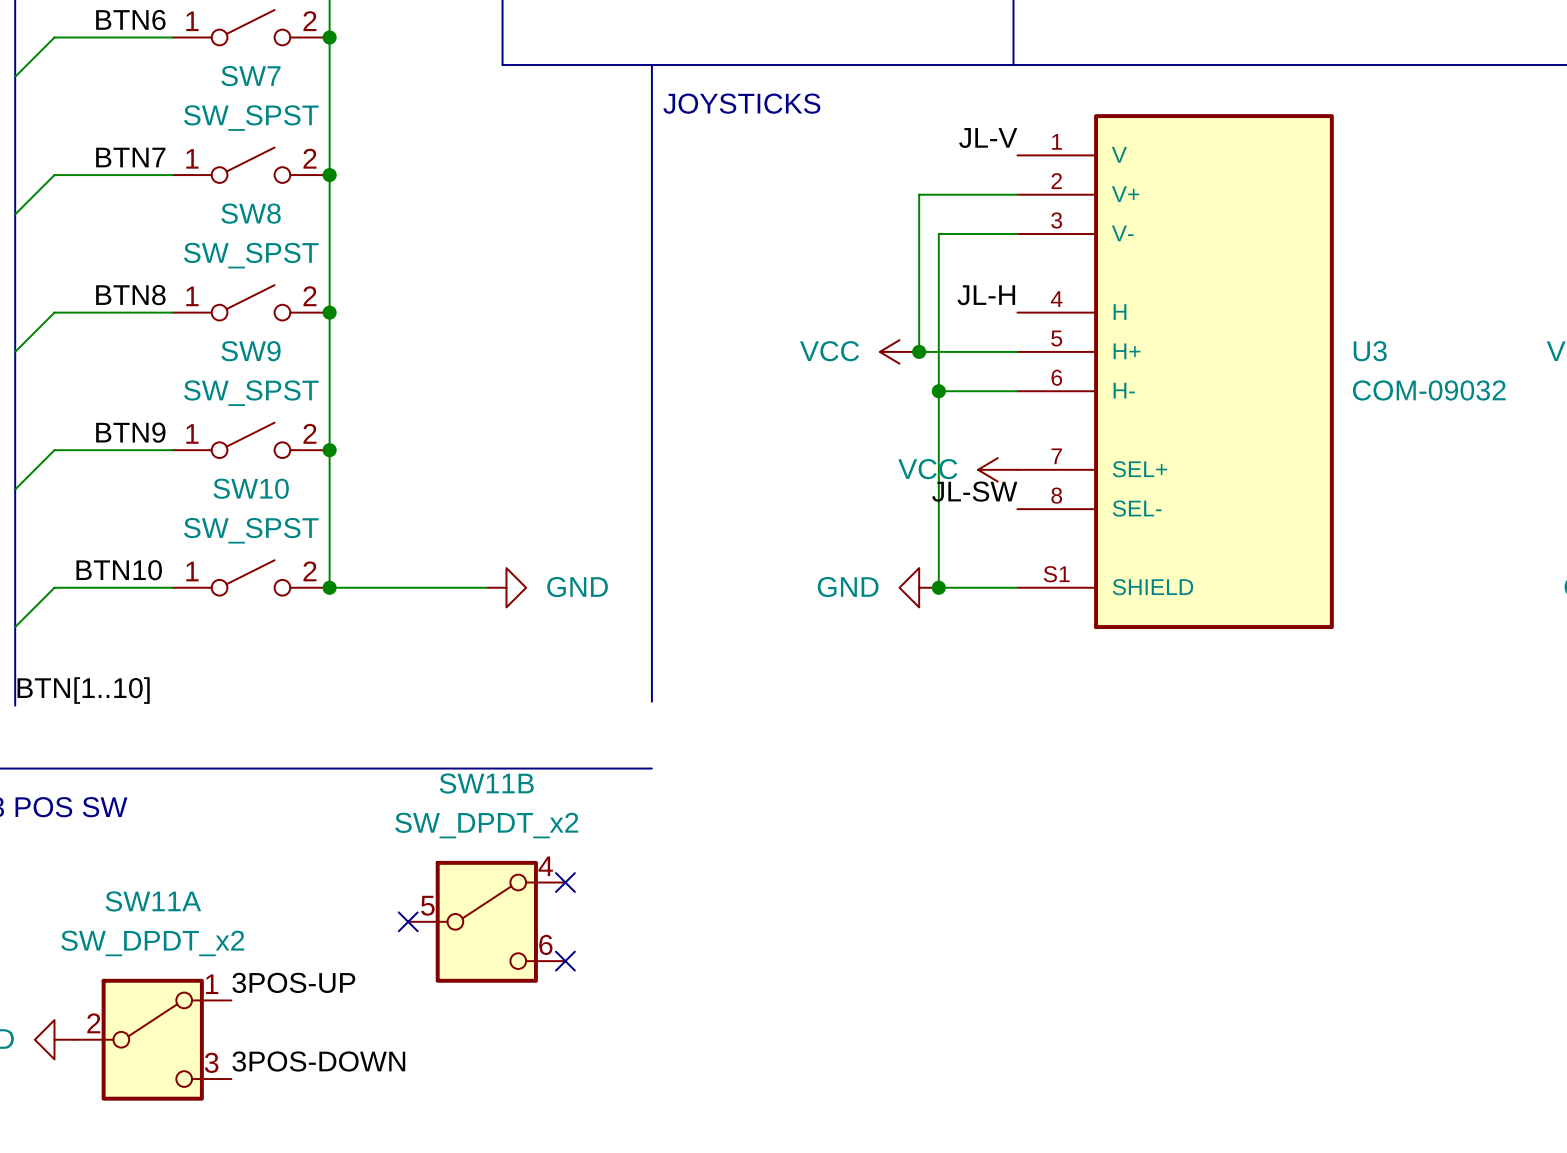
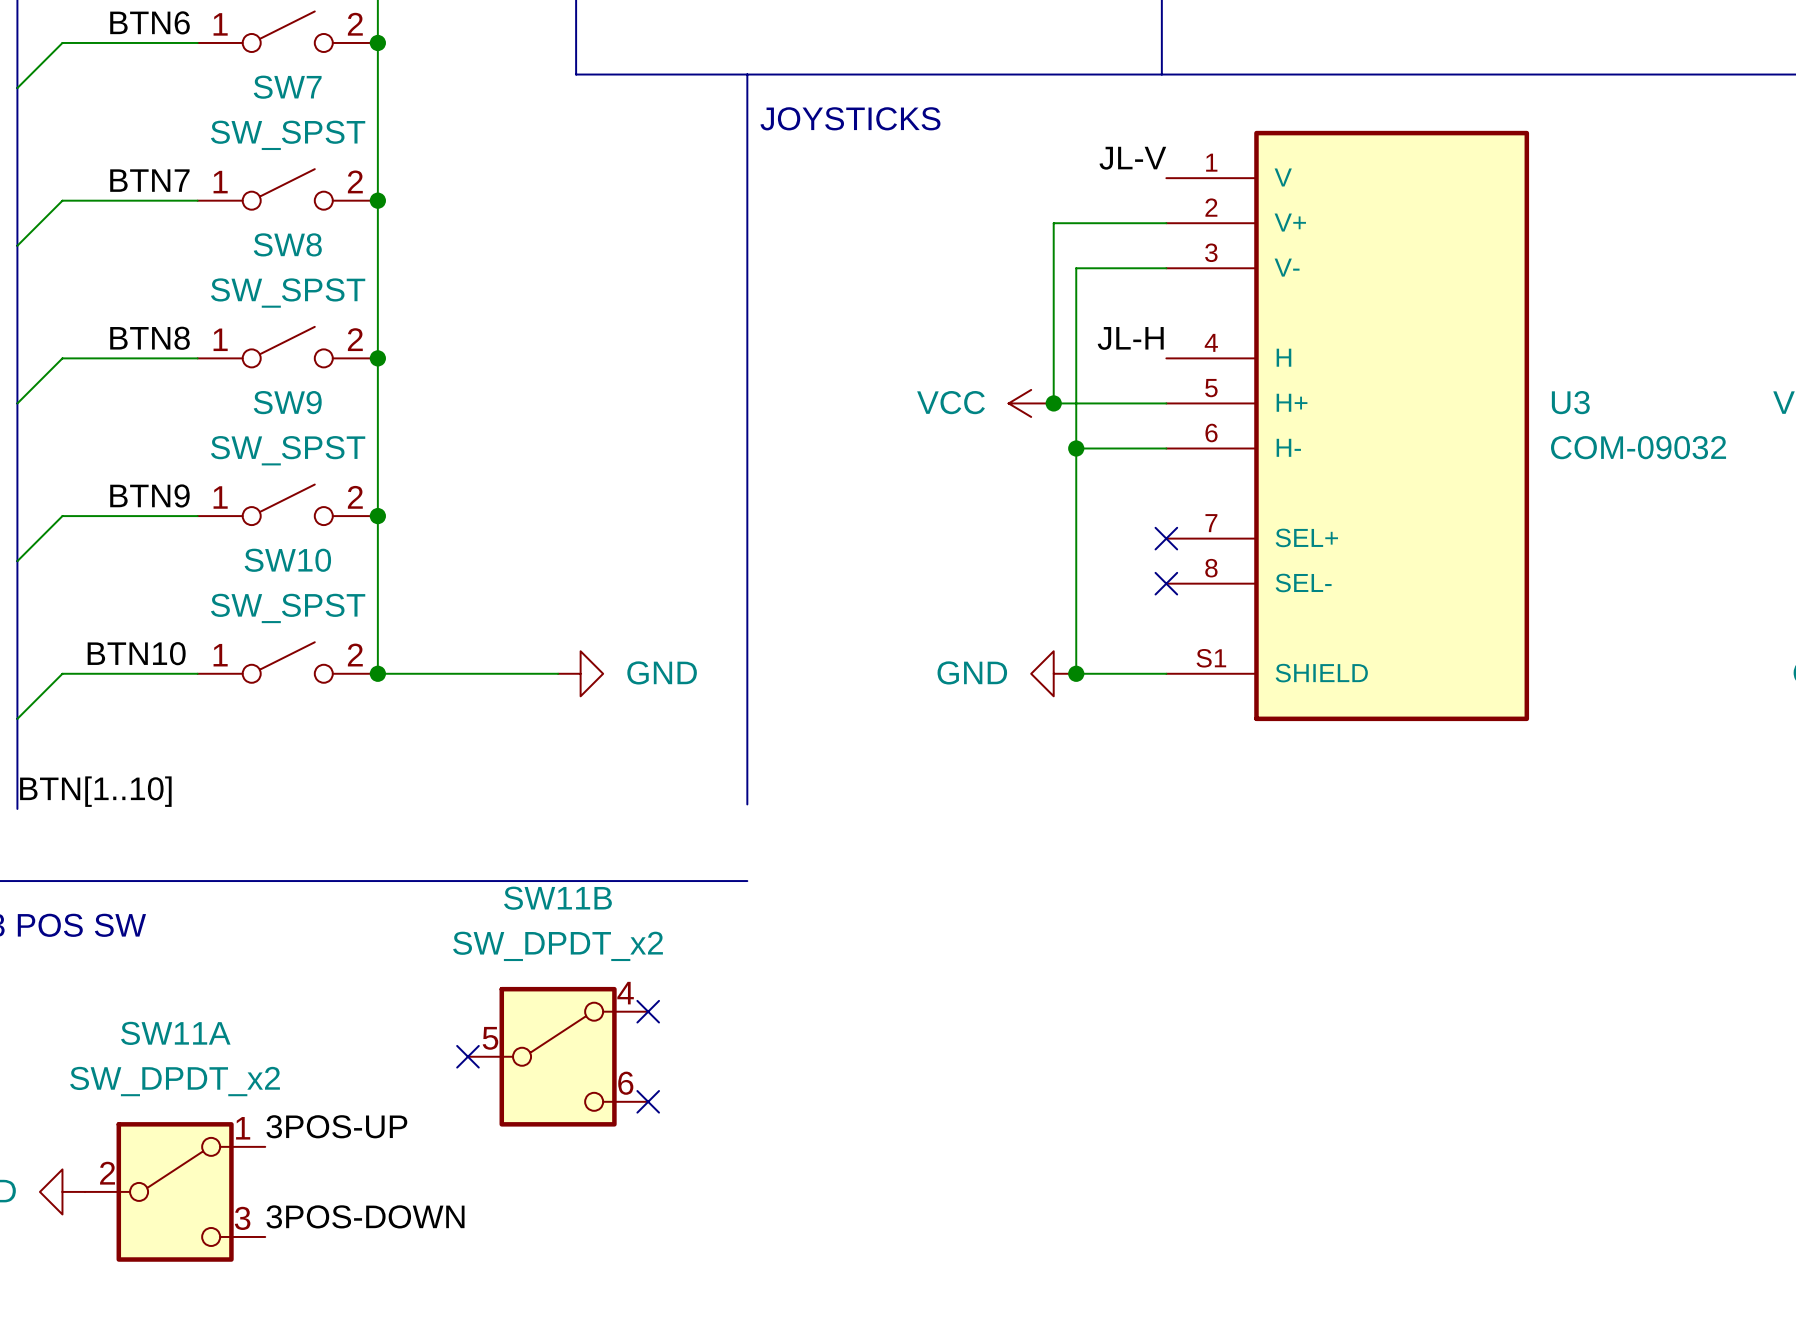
power symbol: VCC (997, 469) -> none
no-connect mark: none -> (1166, 538)
label: JL-SW (974, 491) -> none
no-connect mark: none -> (1166, 583)

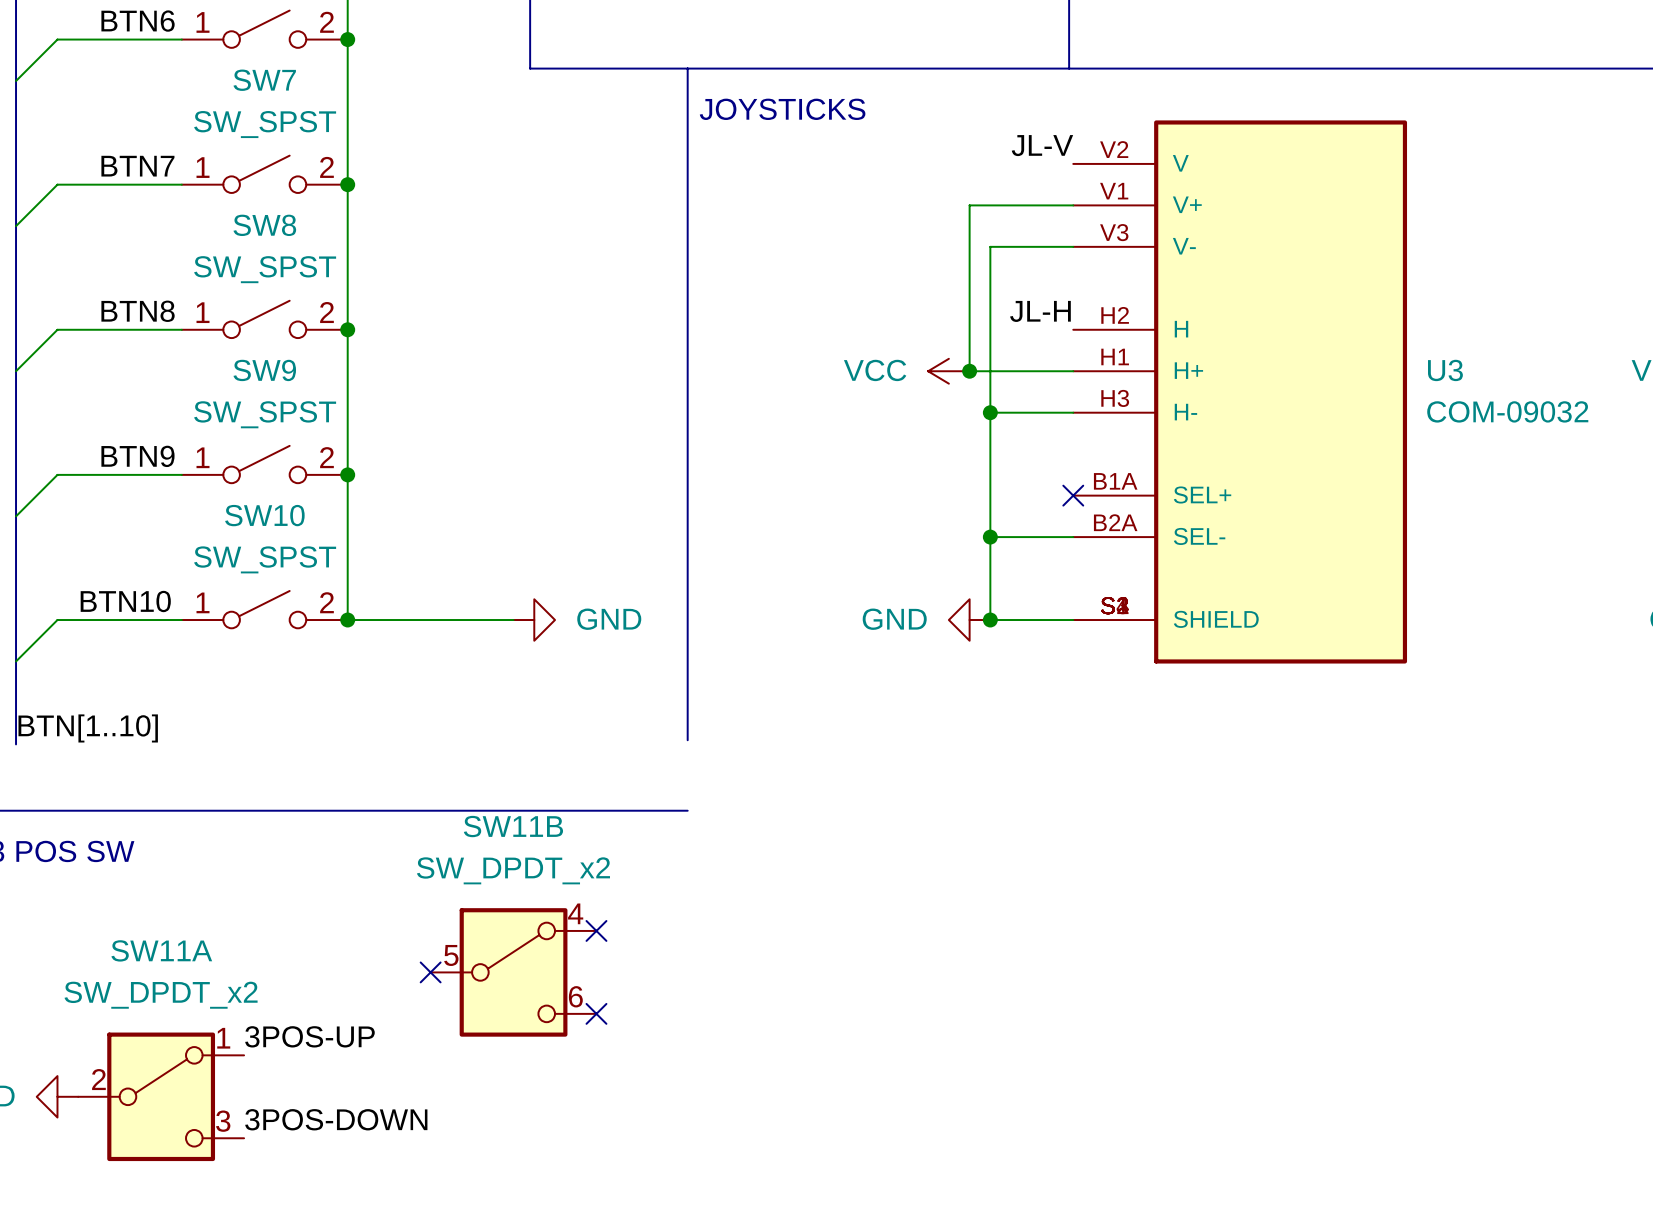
U3 symbol: [1166, 130, 1530, 722] -> [1073, 120, 1408, 664]
wire: none -> (990, 537) (1073, 537)
junction: none -> (990, 537)
no-connect mark: (1166, 583) -> none

